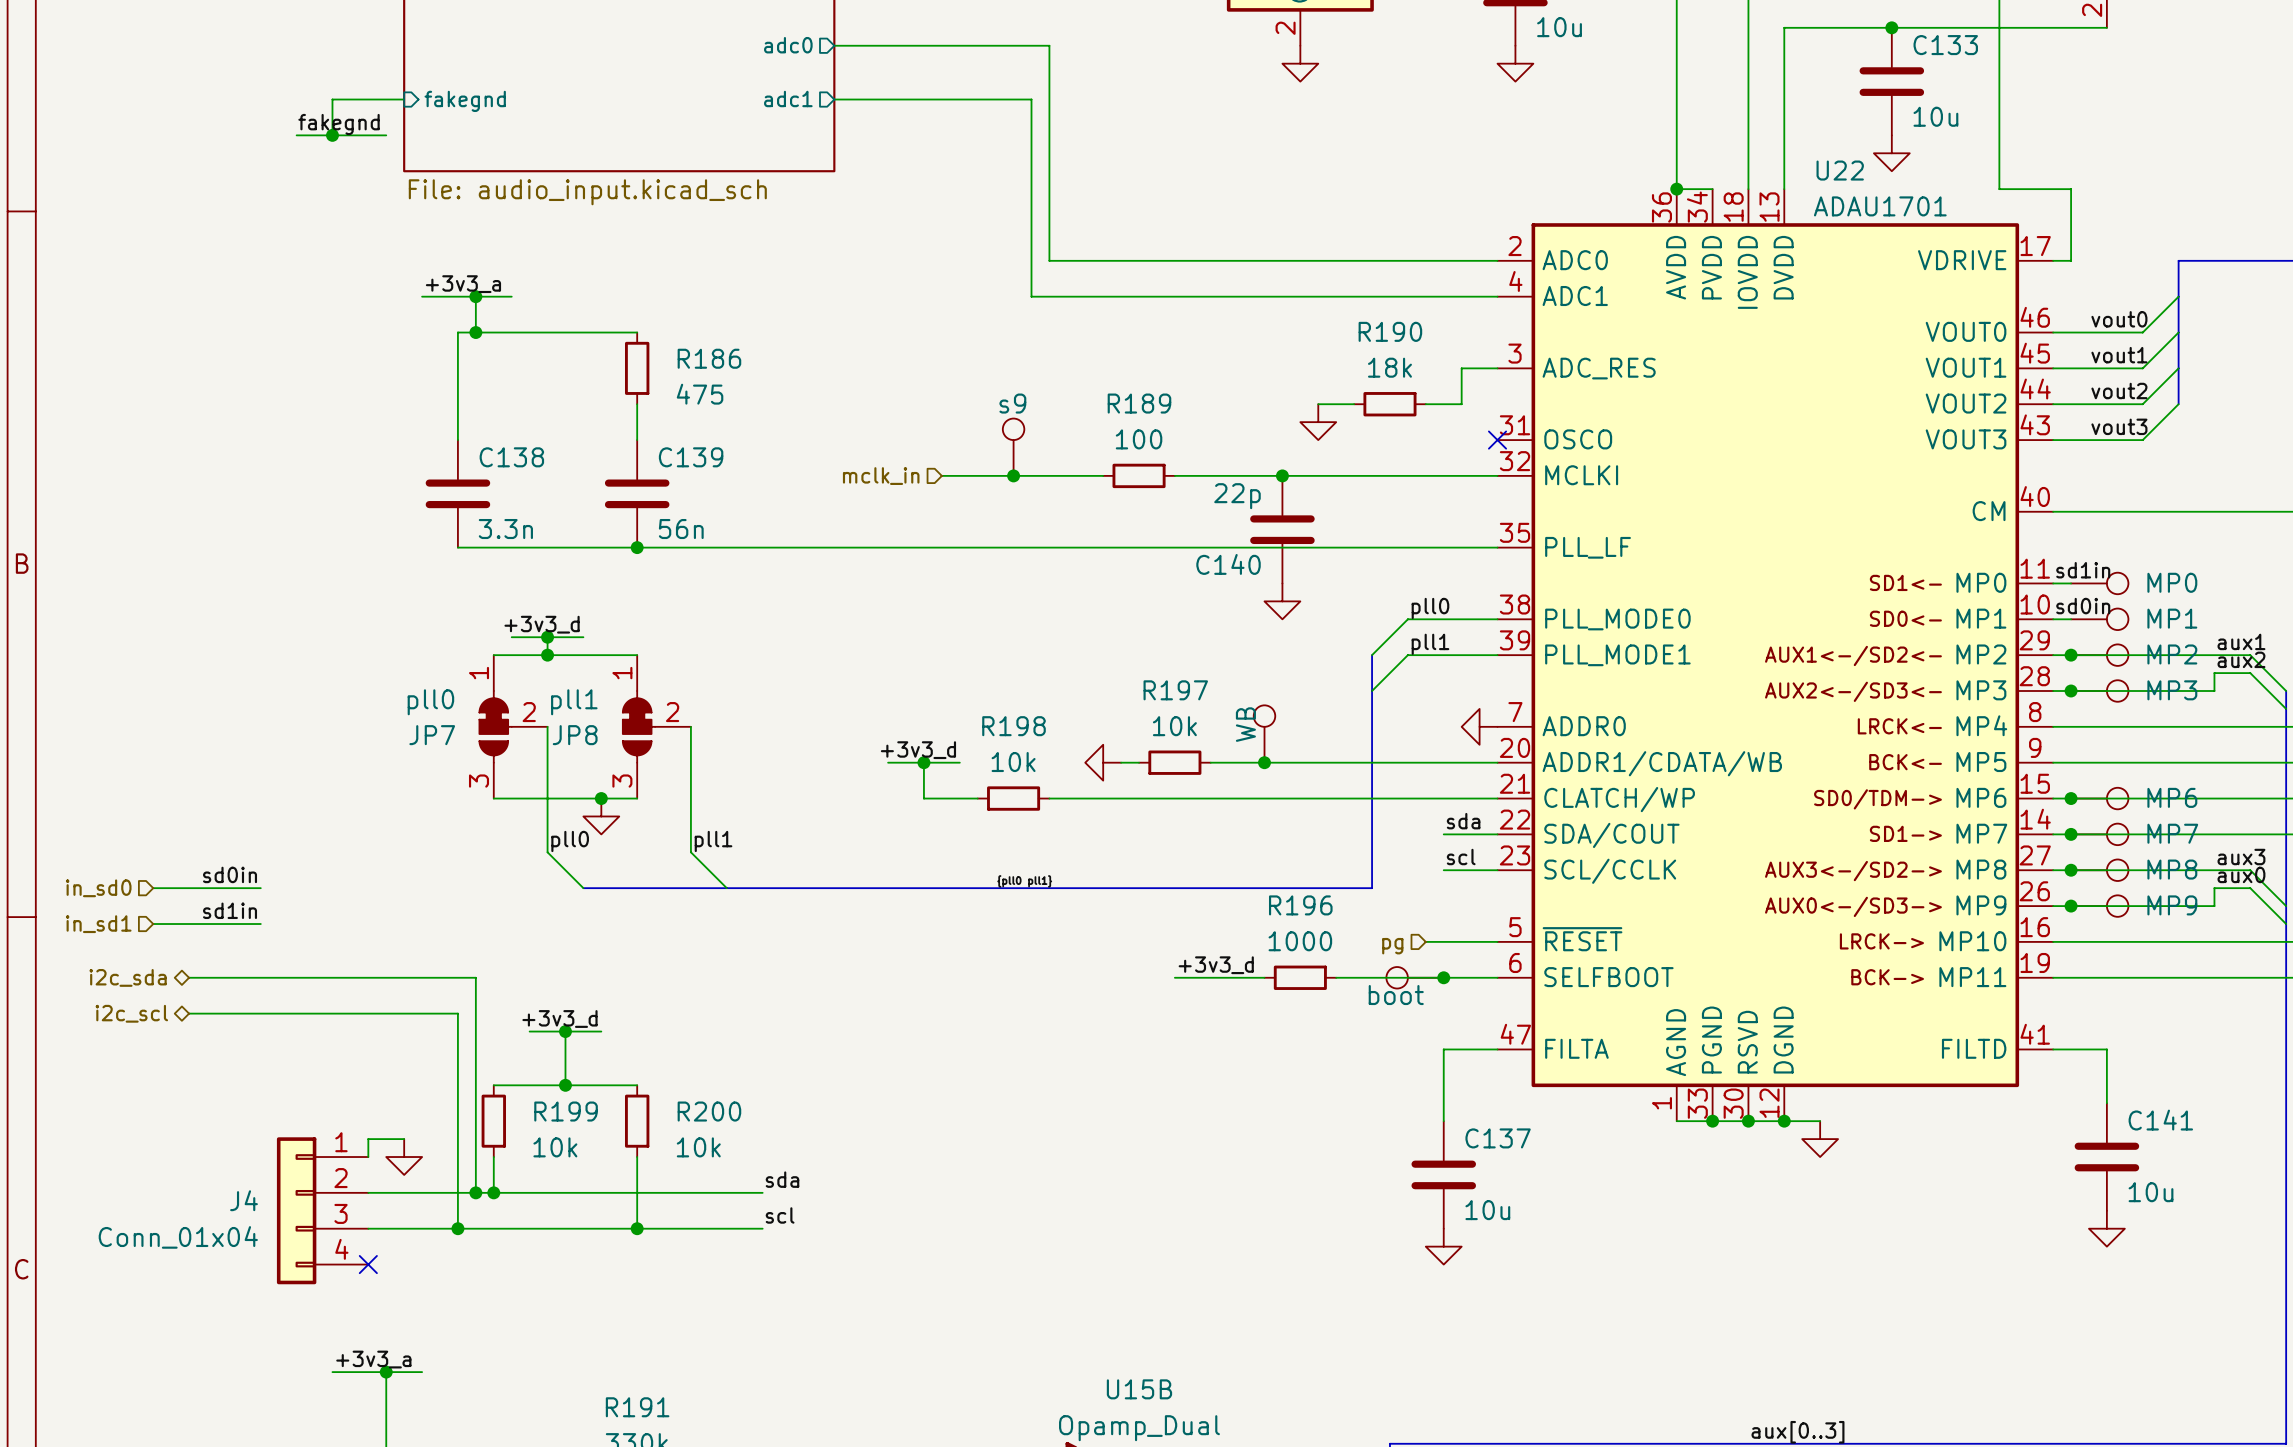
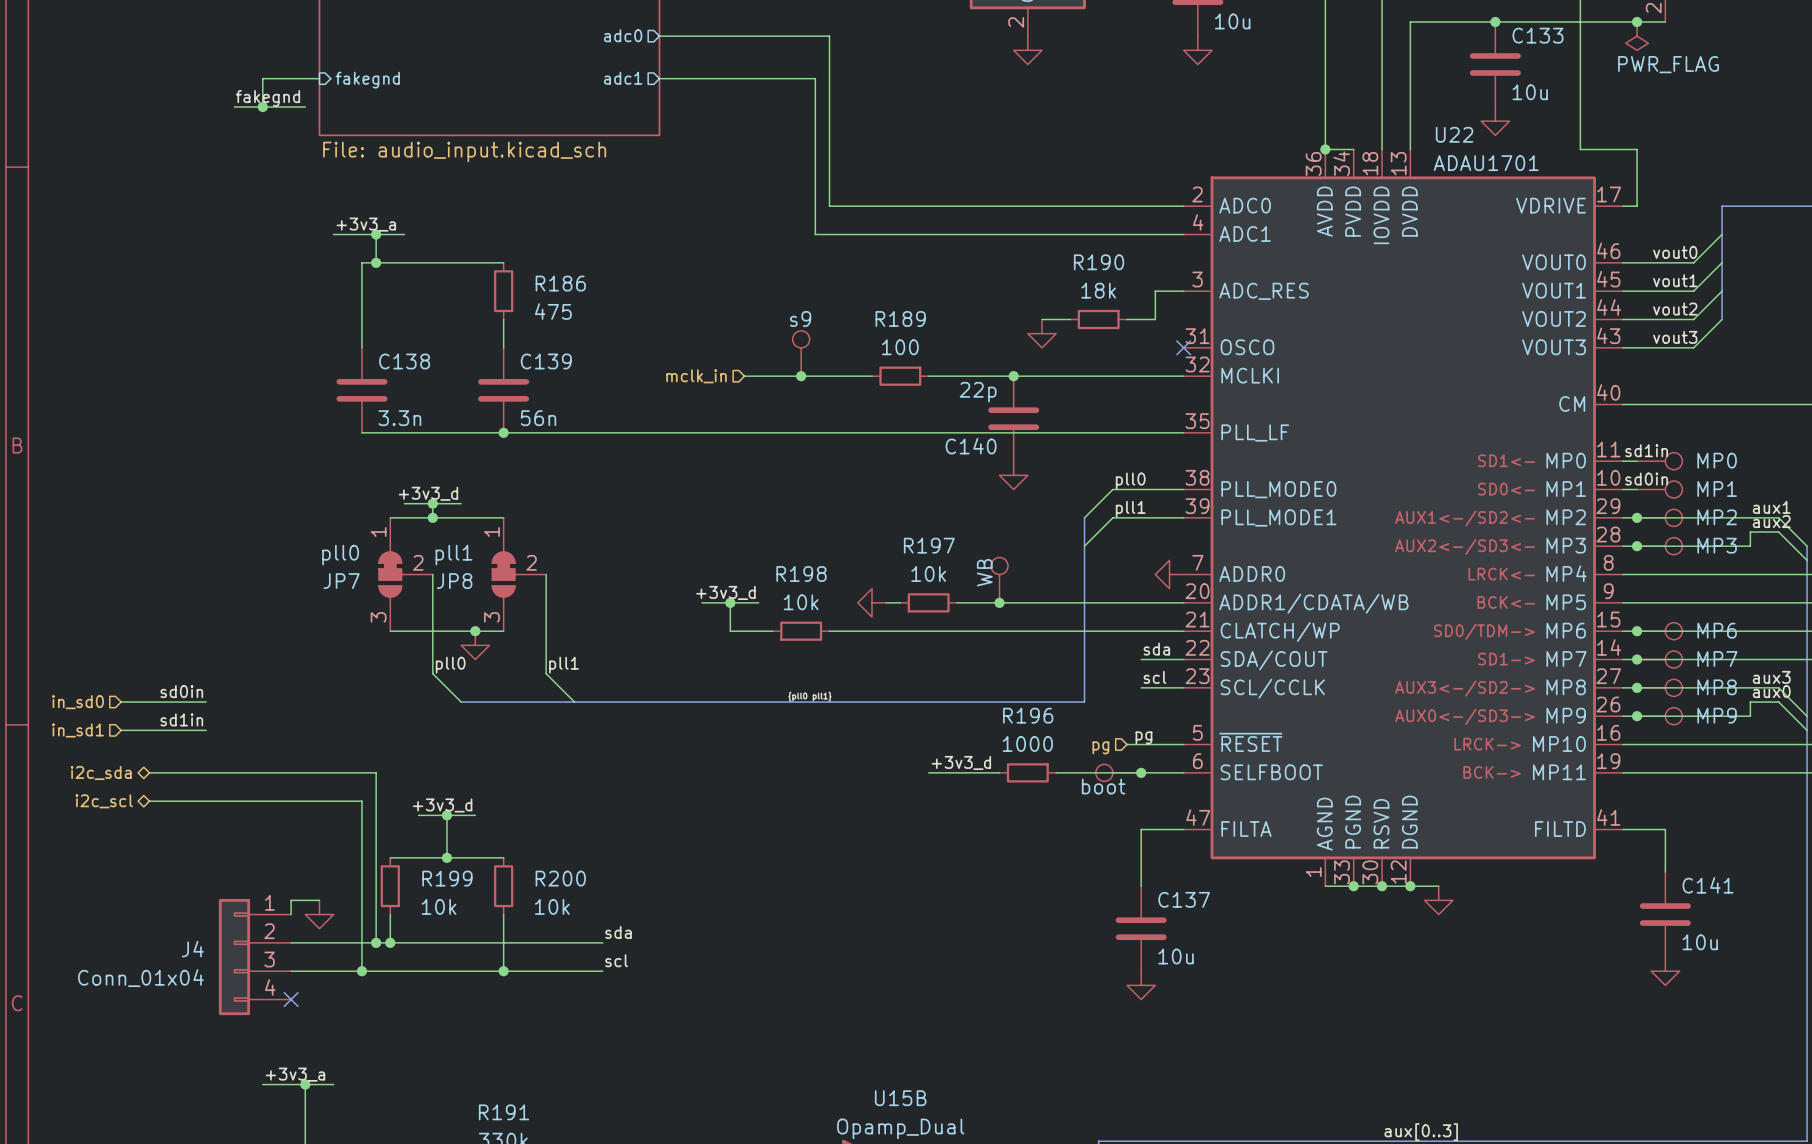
junction: none -> (1637, 21)
power symbol: none -> PWR_FLAG (1637, 36)
label: none -> pg (1143, 737)

